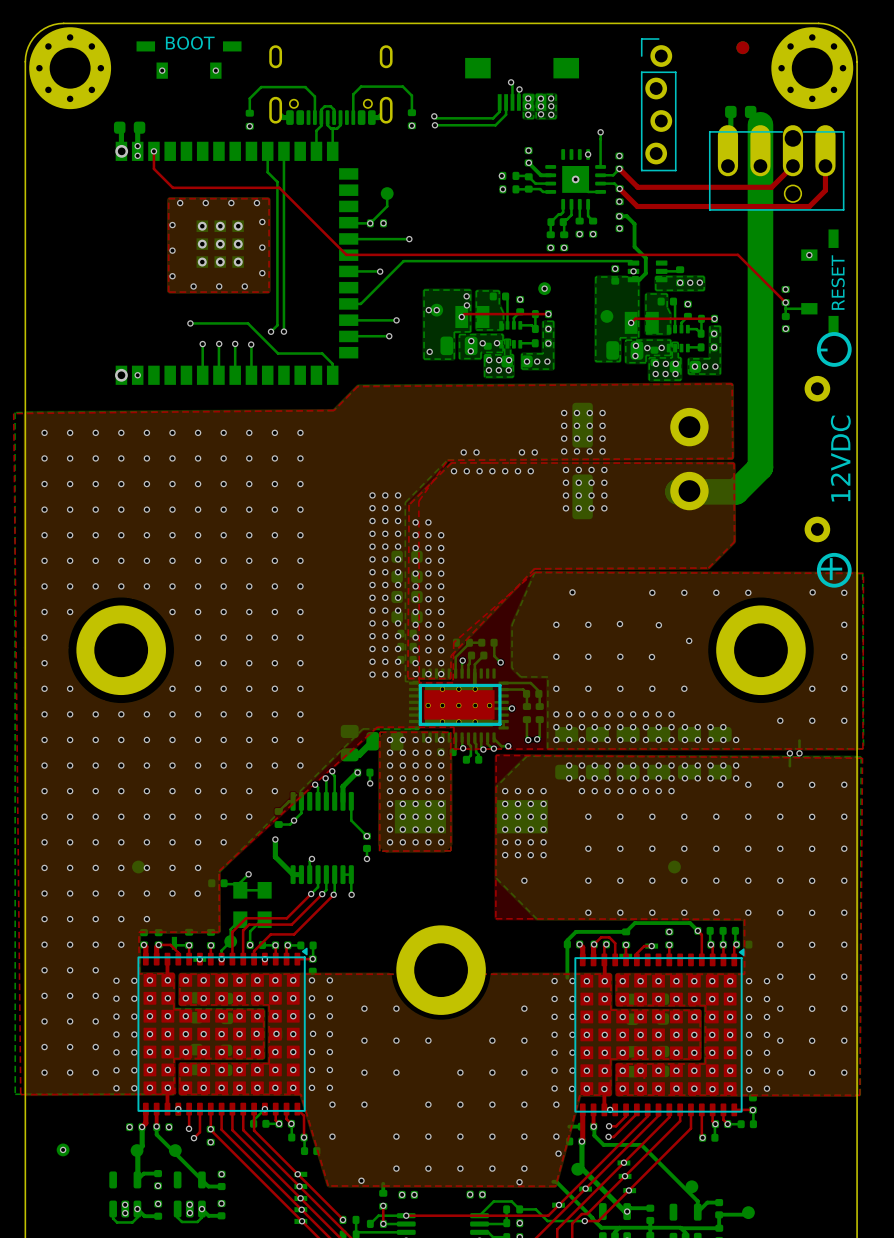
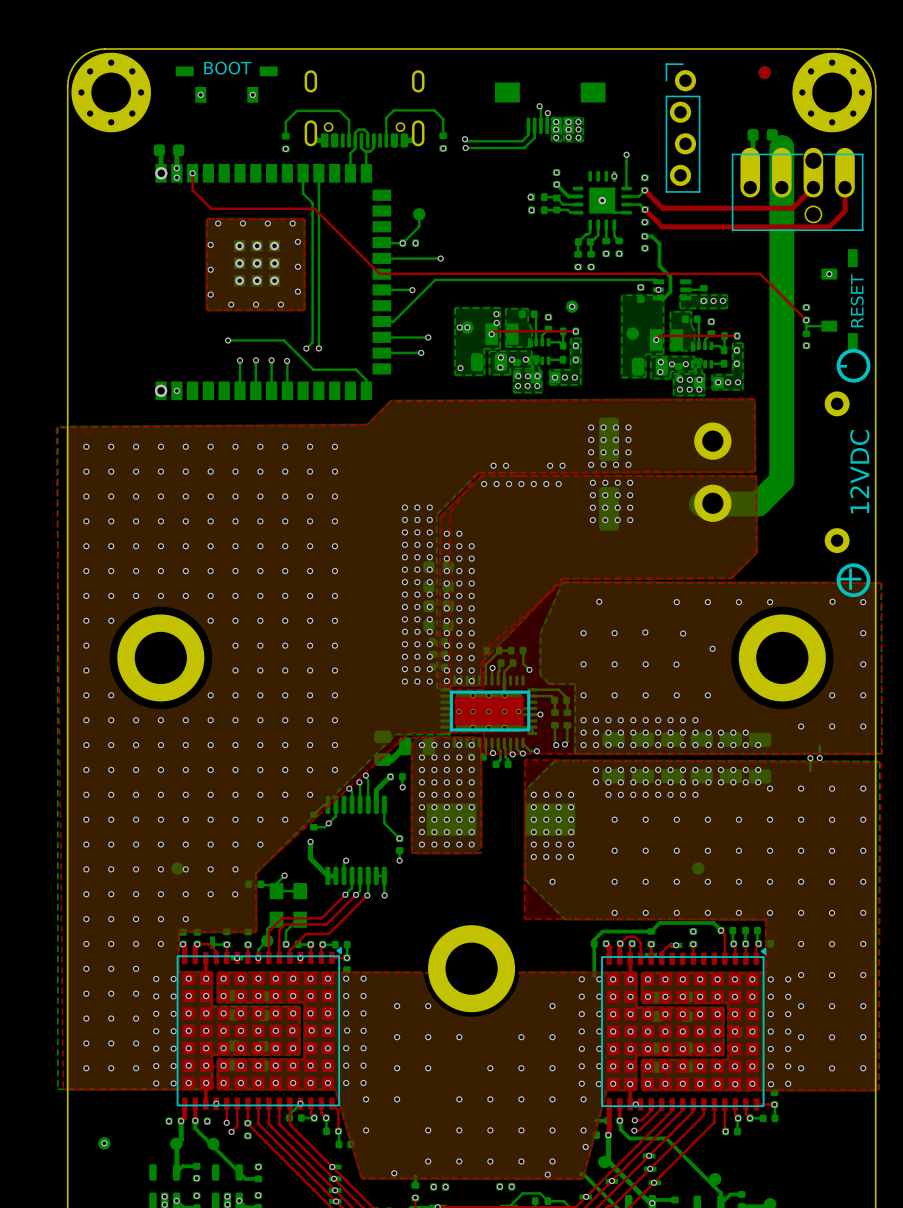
part: (566, 753) -> none
part: none -> (613, 757)
part: (597, 753) -> none
part: none -> (642, 757)
part: (628, 753) -> none
part: none -> (672, 757)
part: (658, 753) -> none
part: none -> (701, 757)
part: (689, 753) -> none
part: none -> (730, 757)
part: (720, 753) -> none
part: none -> (760, 758)

